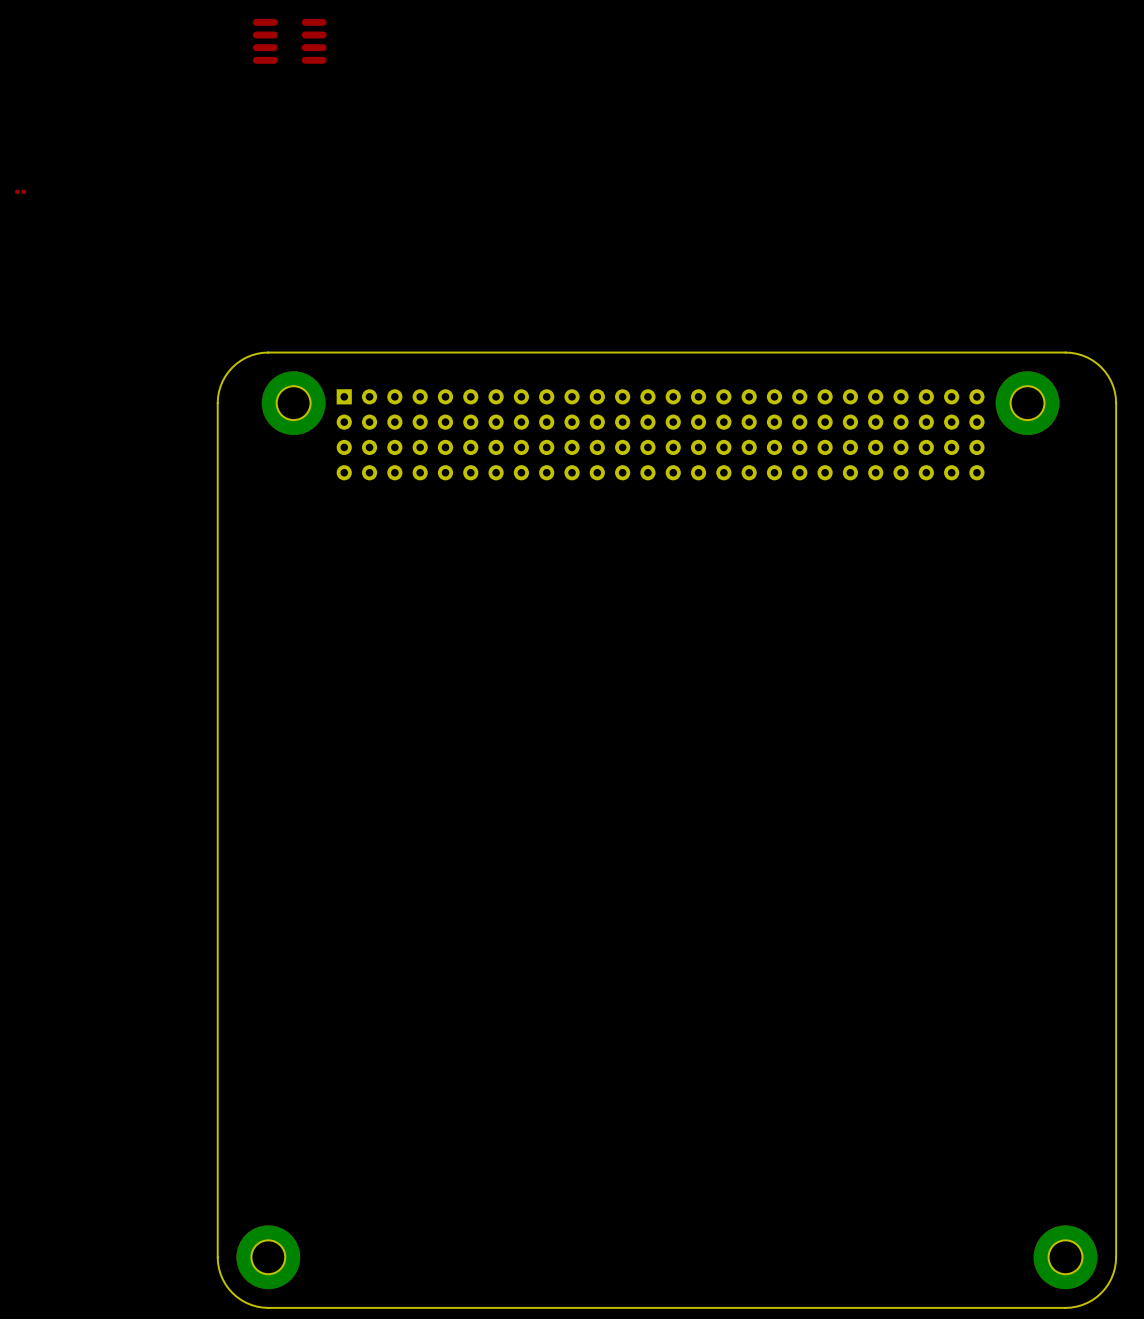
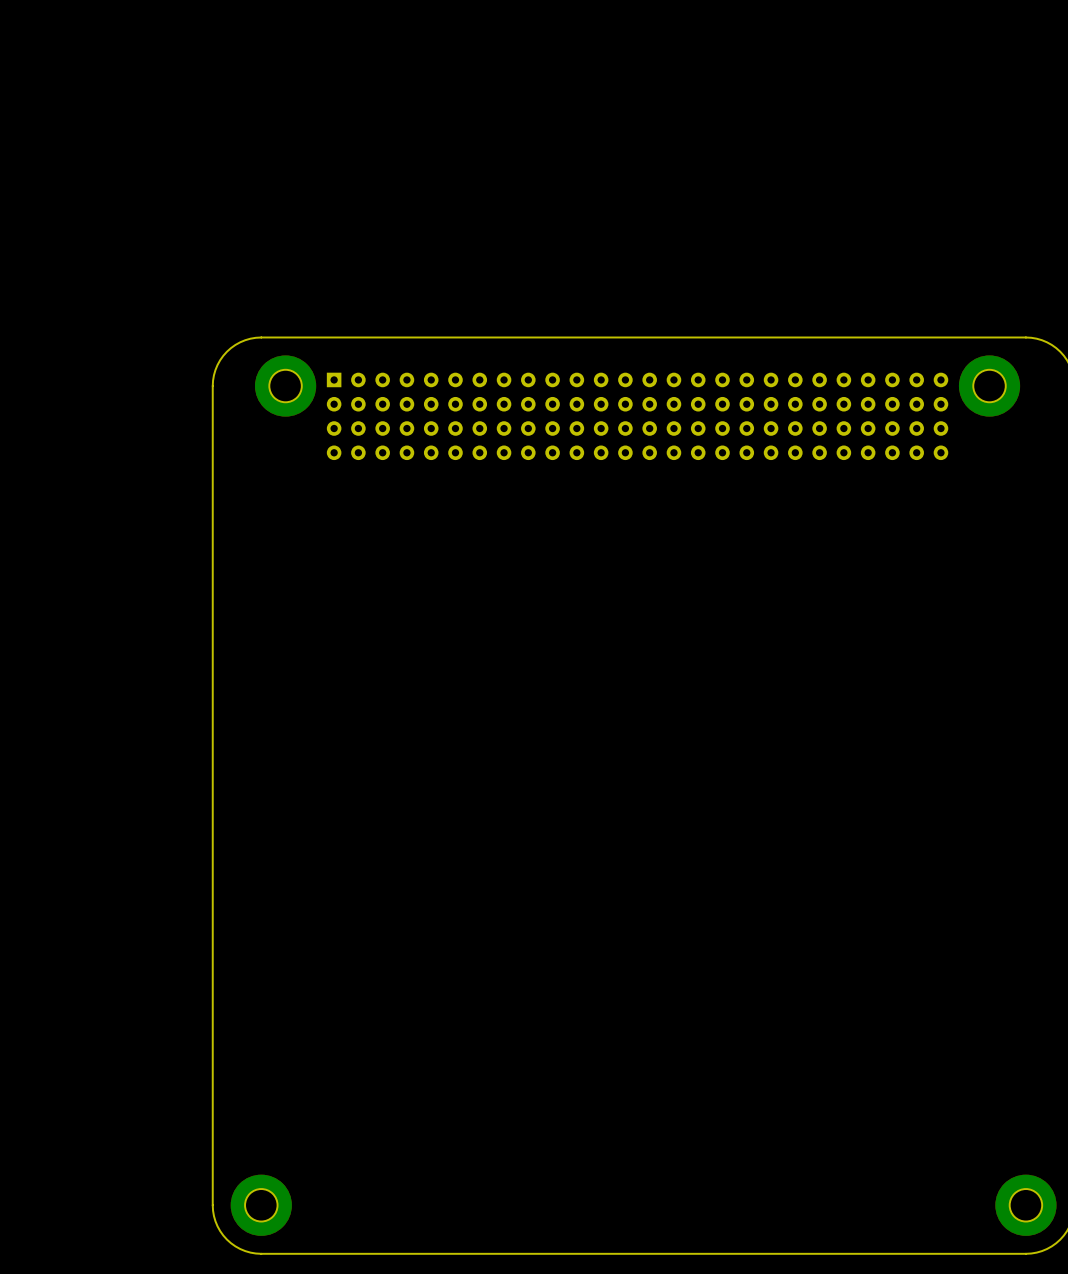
part: (289, 41) -> none
part: (20, 191) -> none

